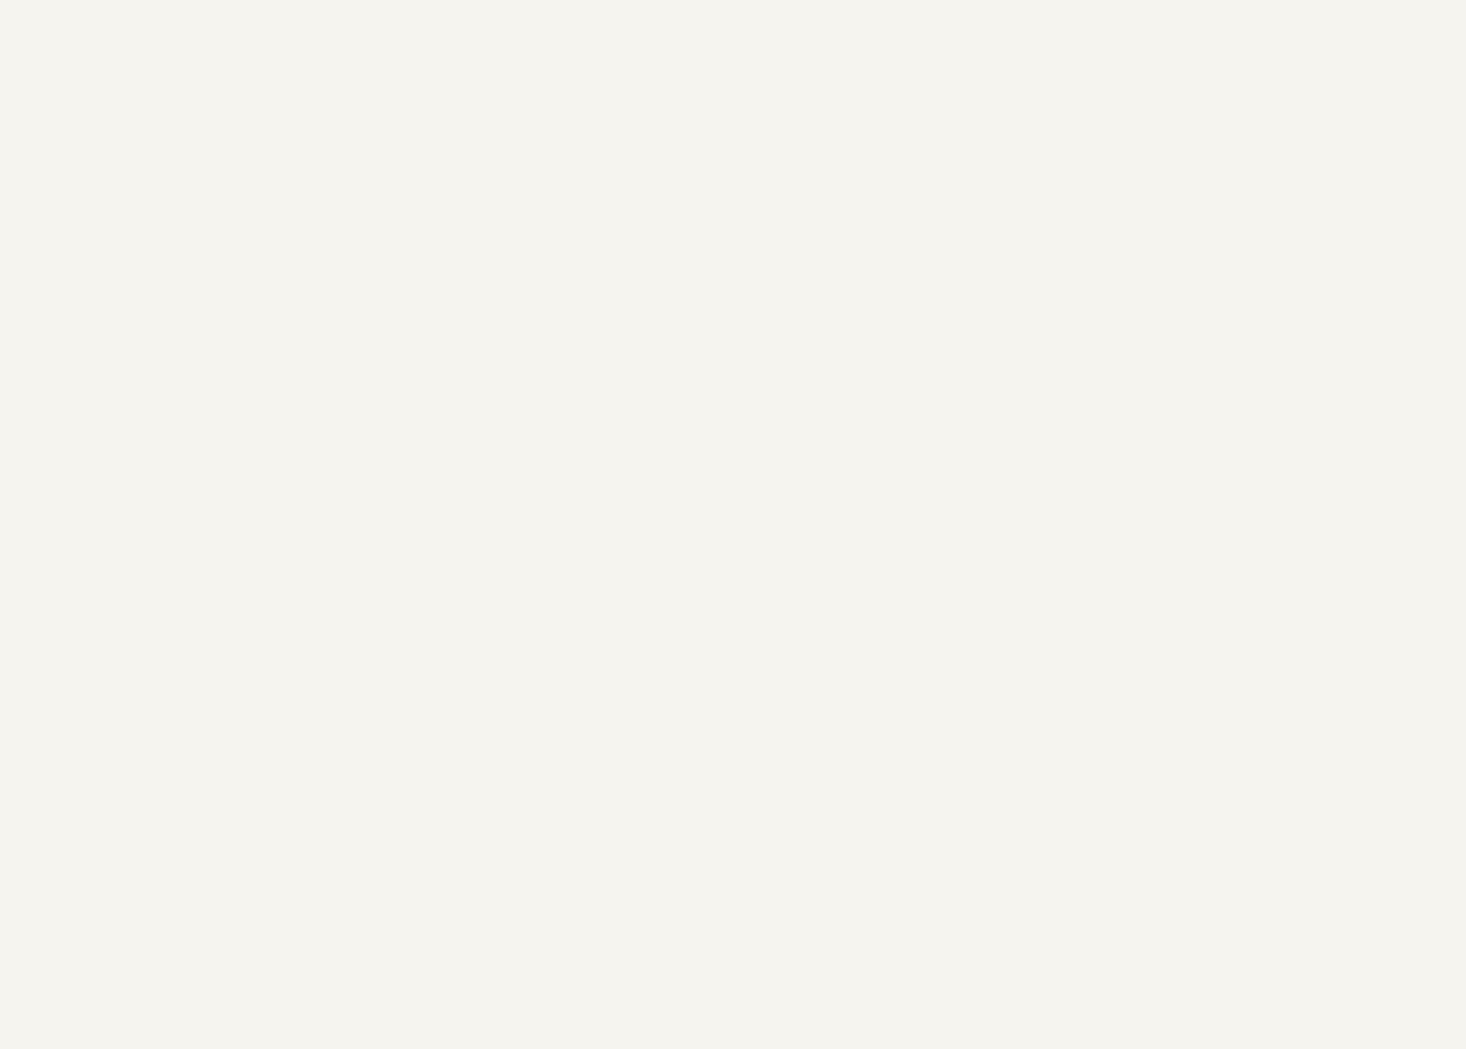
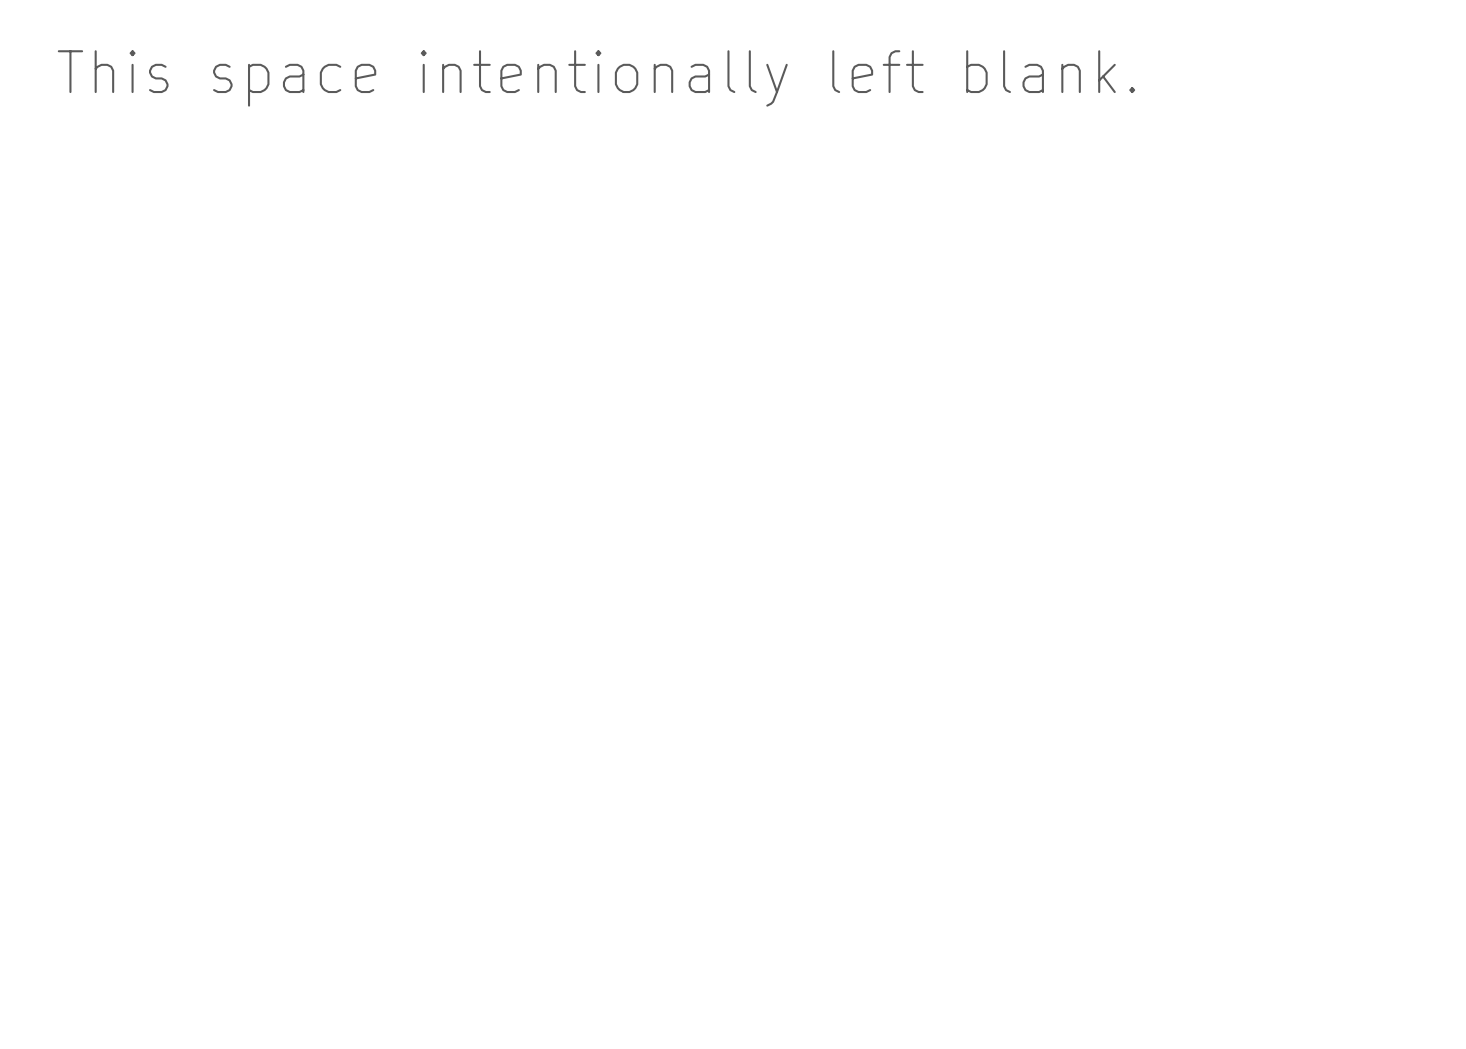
text: none -> This space intentionally left blank. (596, 78)

